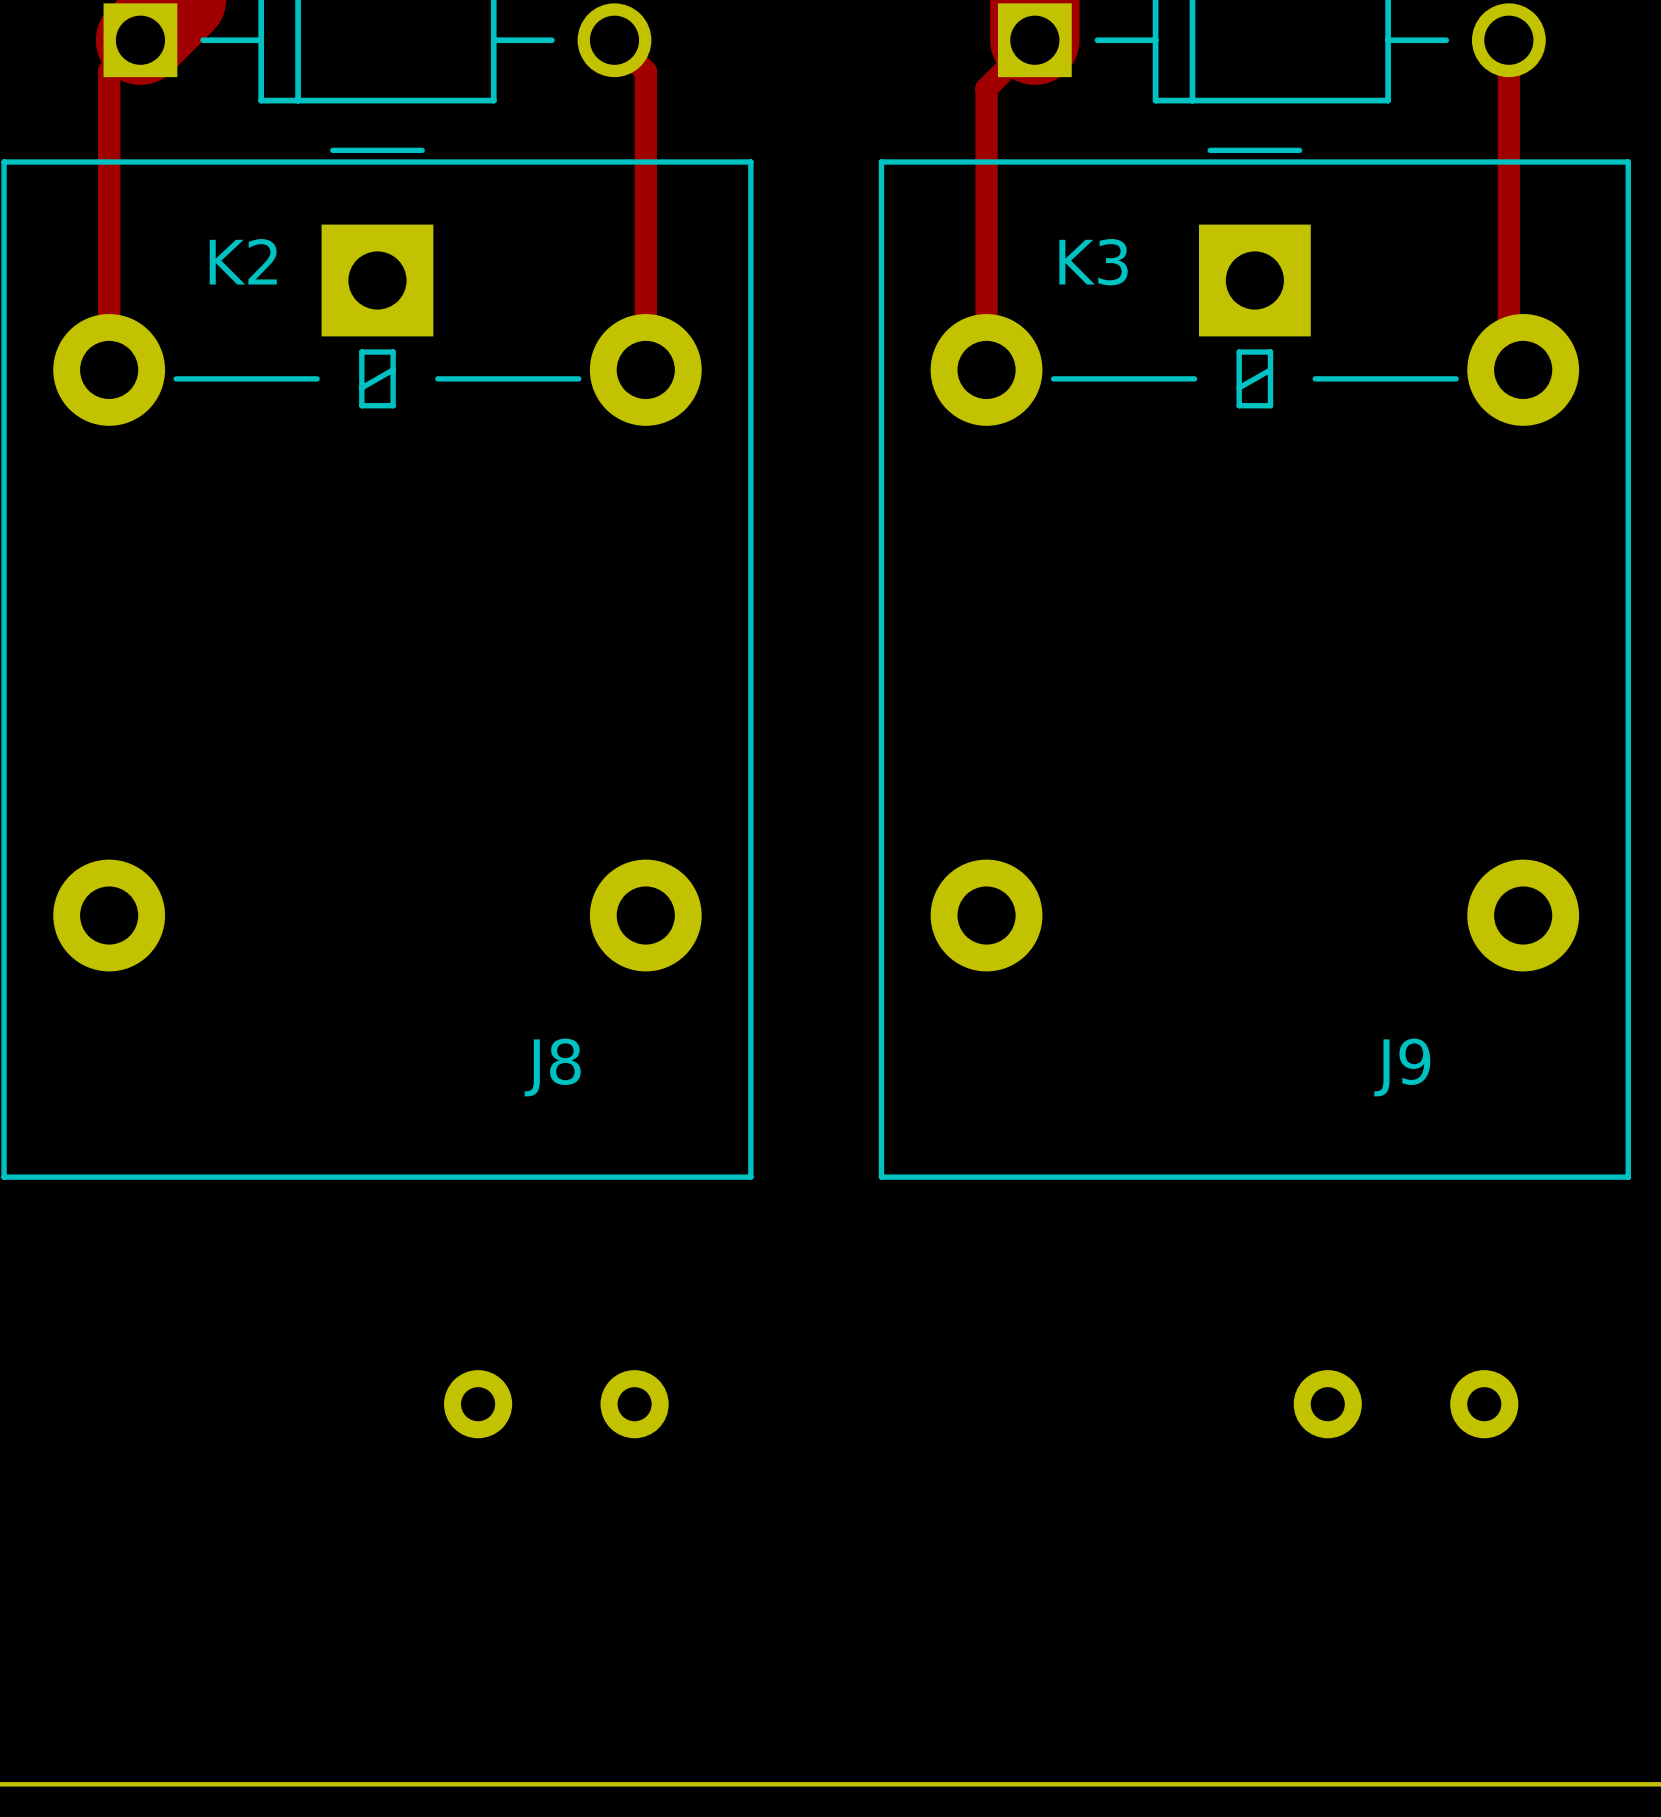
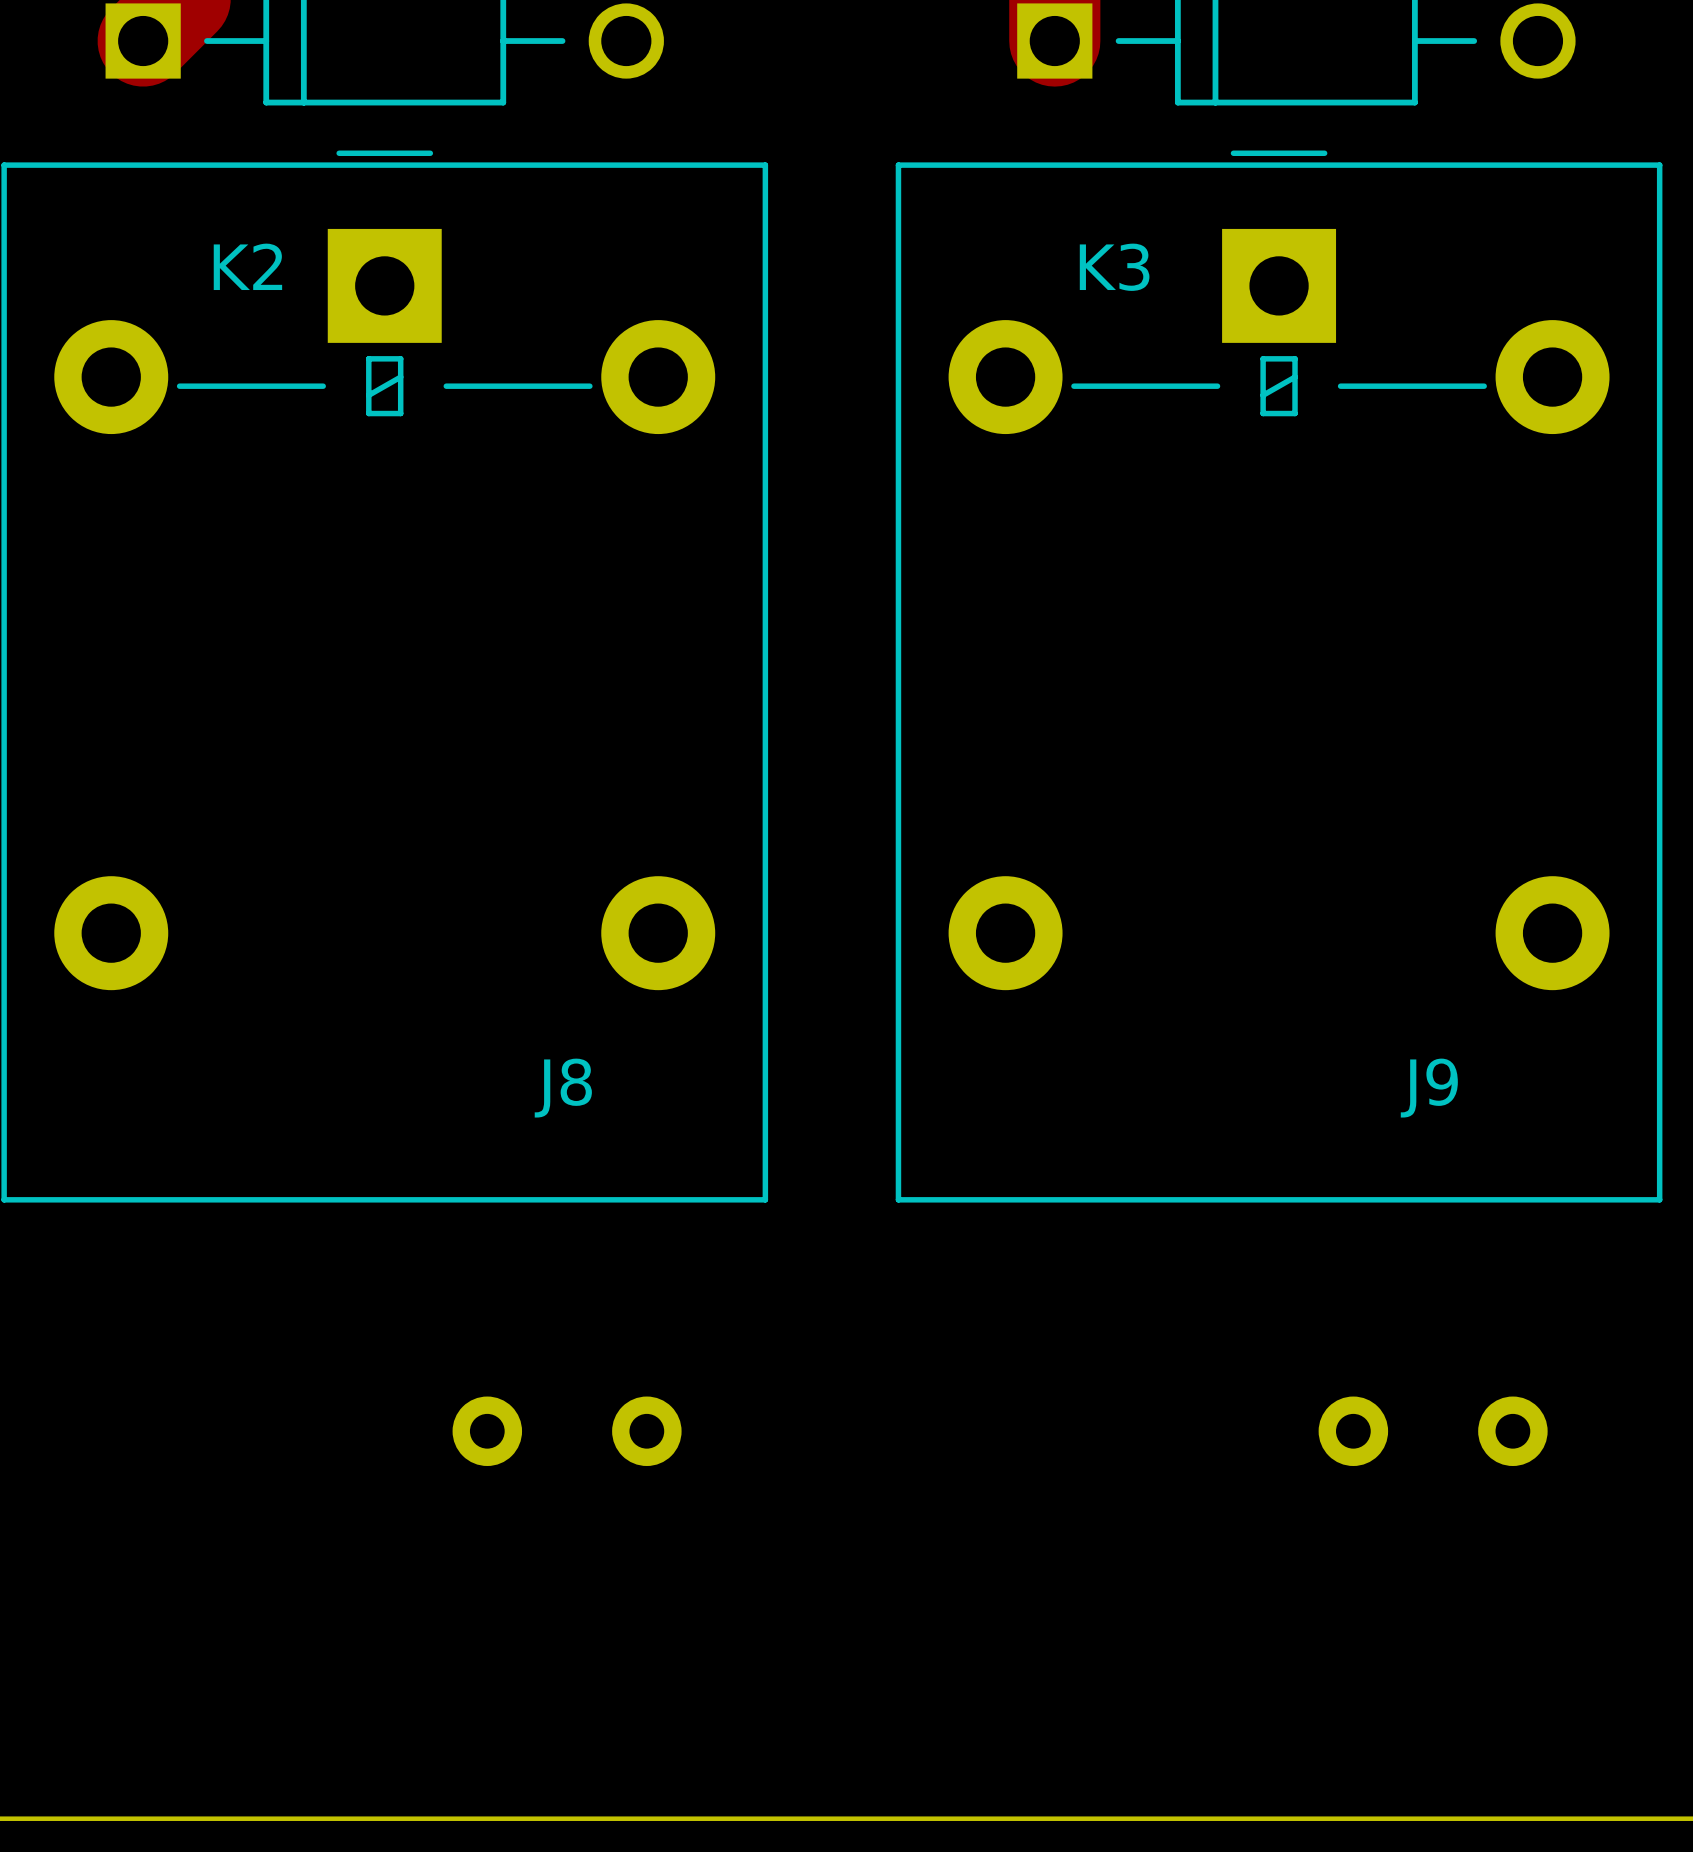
track: (140, 40) (109, 71) (109, 369) -> none
track: (614, 40) (645, 71) (645, 369) -> none
track: (1034, 40) (986, 88) (986, 369) -> none
track: (1508, 40) (1508, 355) -> none

